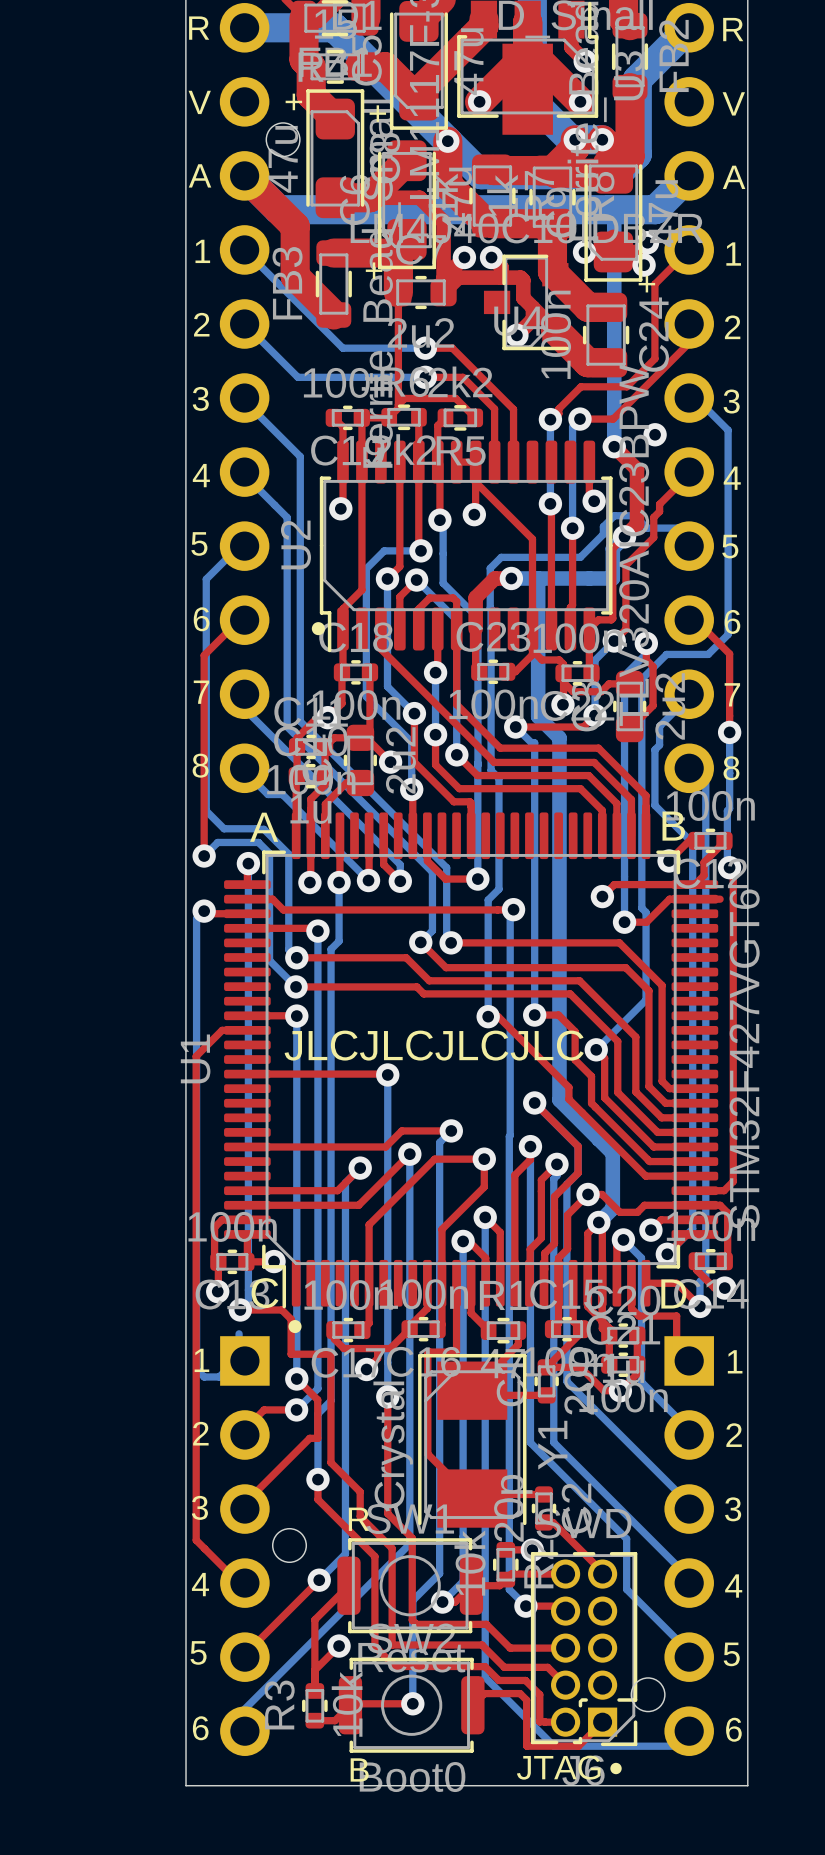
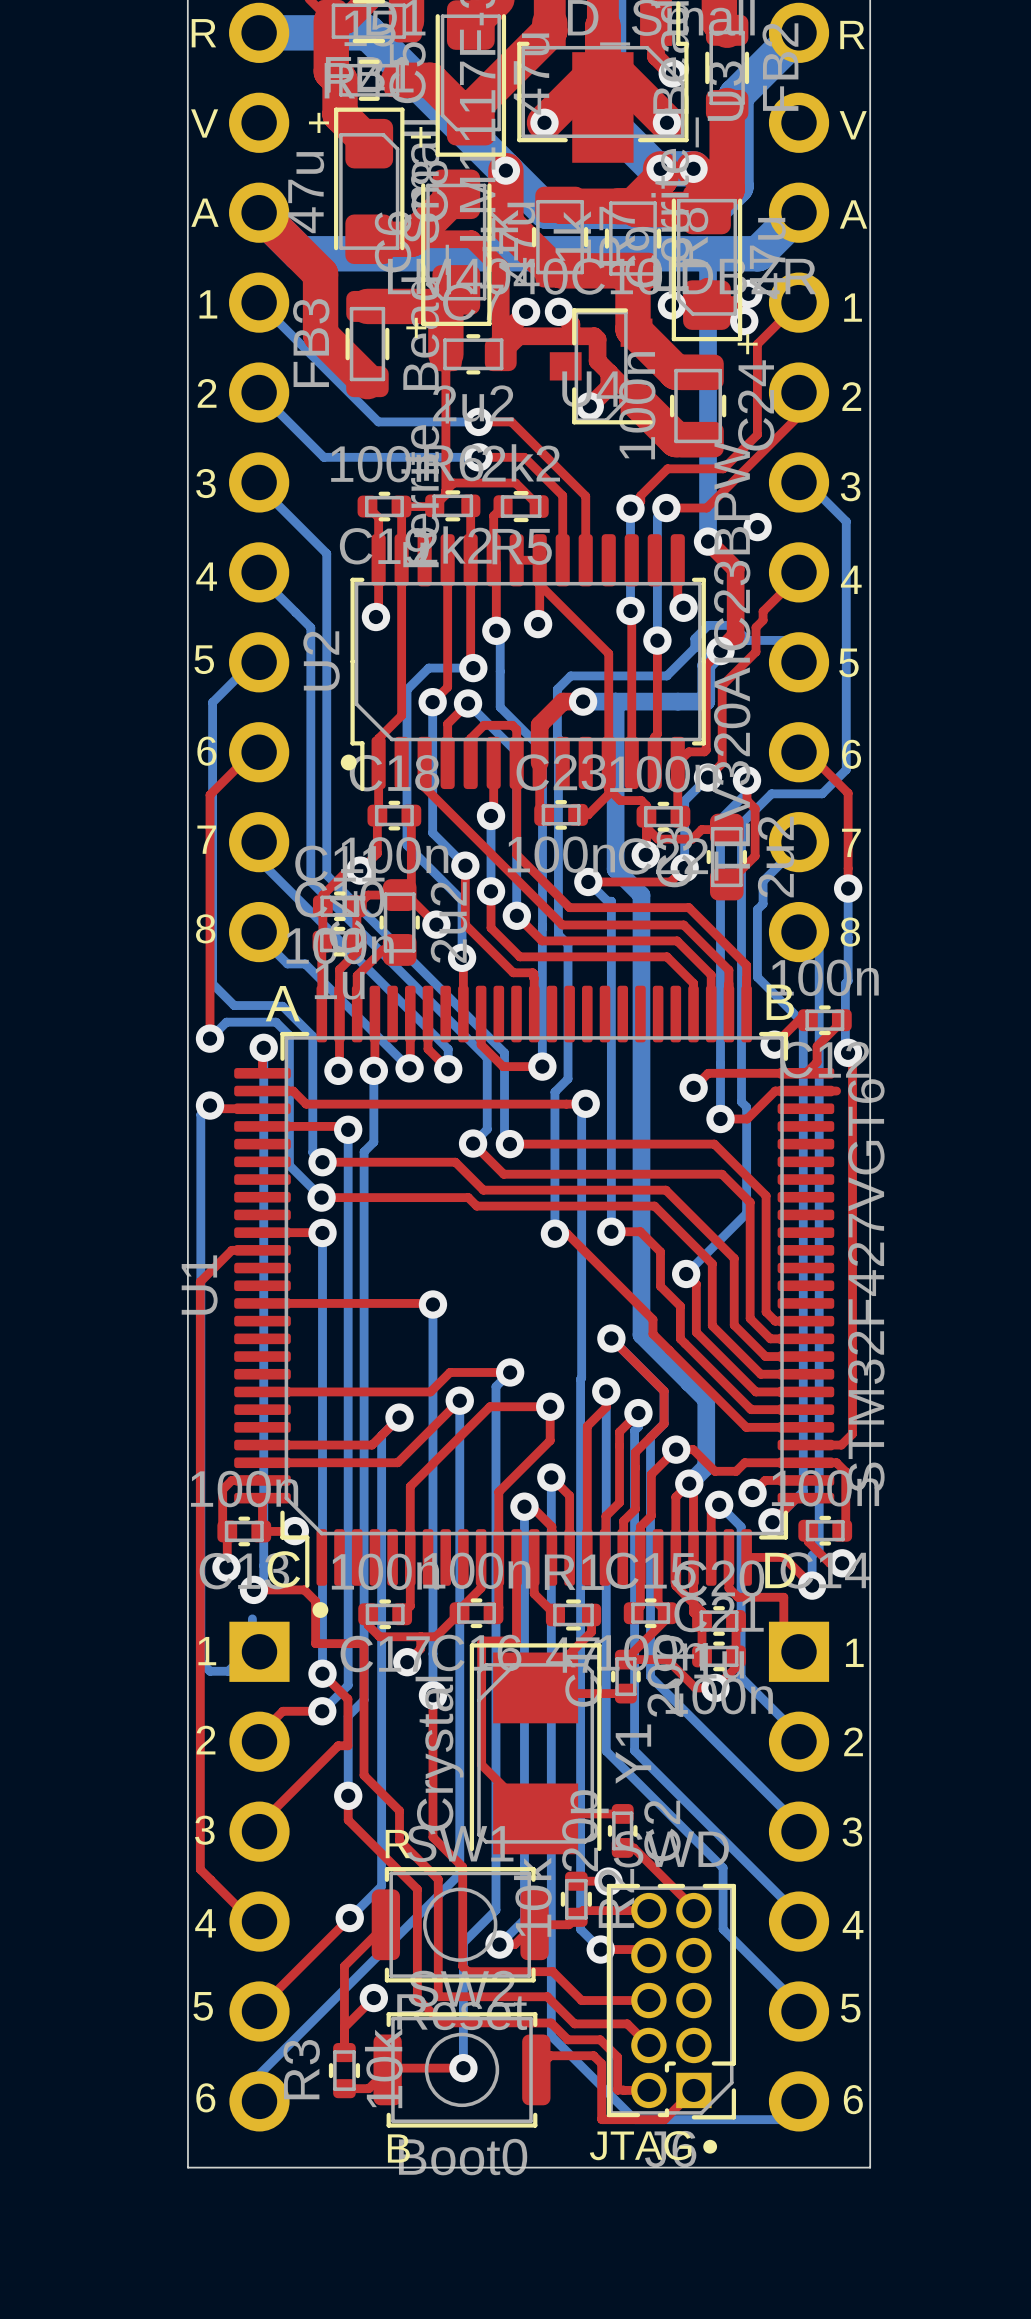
round board edge: [265, 122, 301, 158] -> none
text: JLCJLCJLCJLC (434, 1045) -> none
round board edge: [271, 1527, 308, 1564] -> none
round board edge: [630, 1677, 666, 1713] -> none

